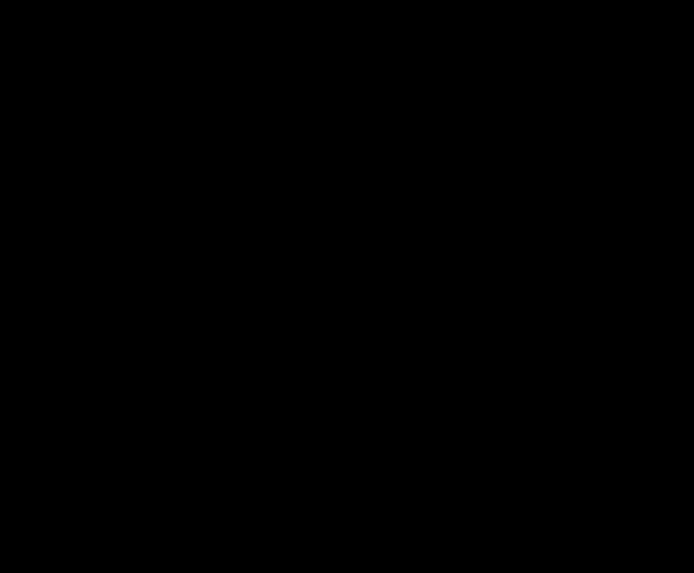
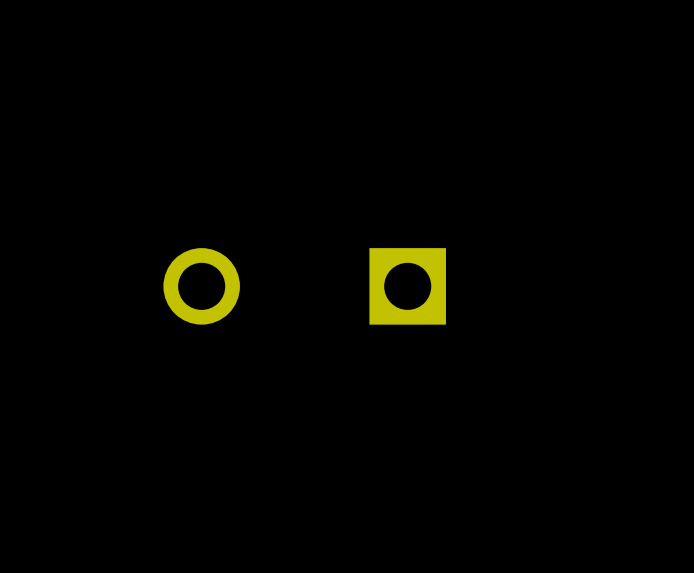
part: none -> (304, 286)

